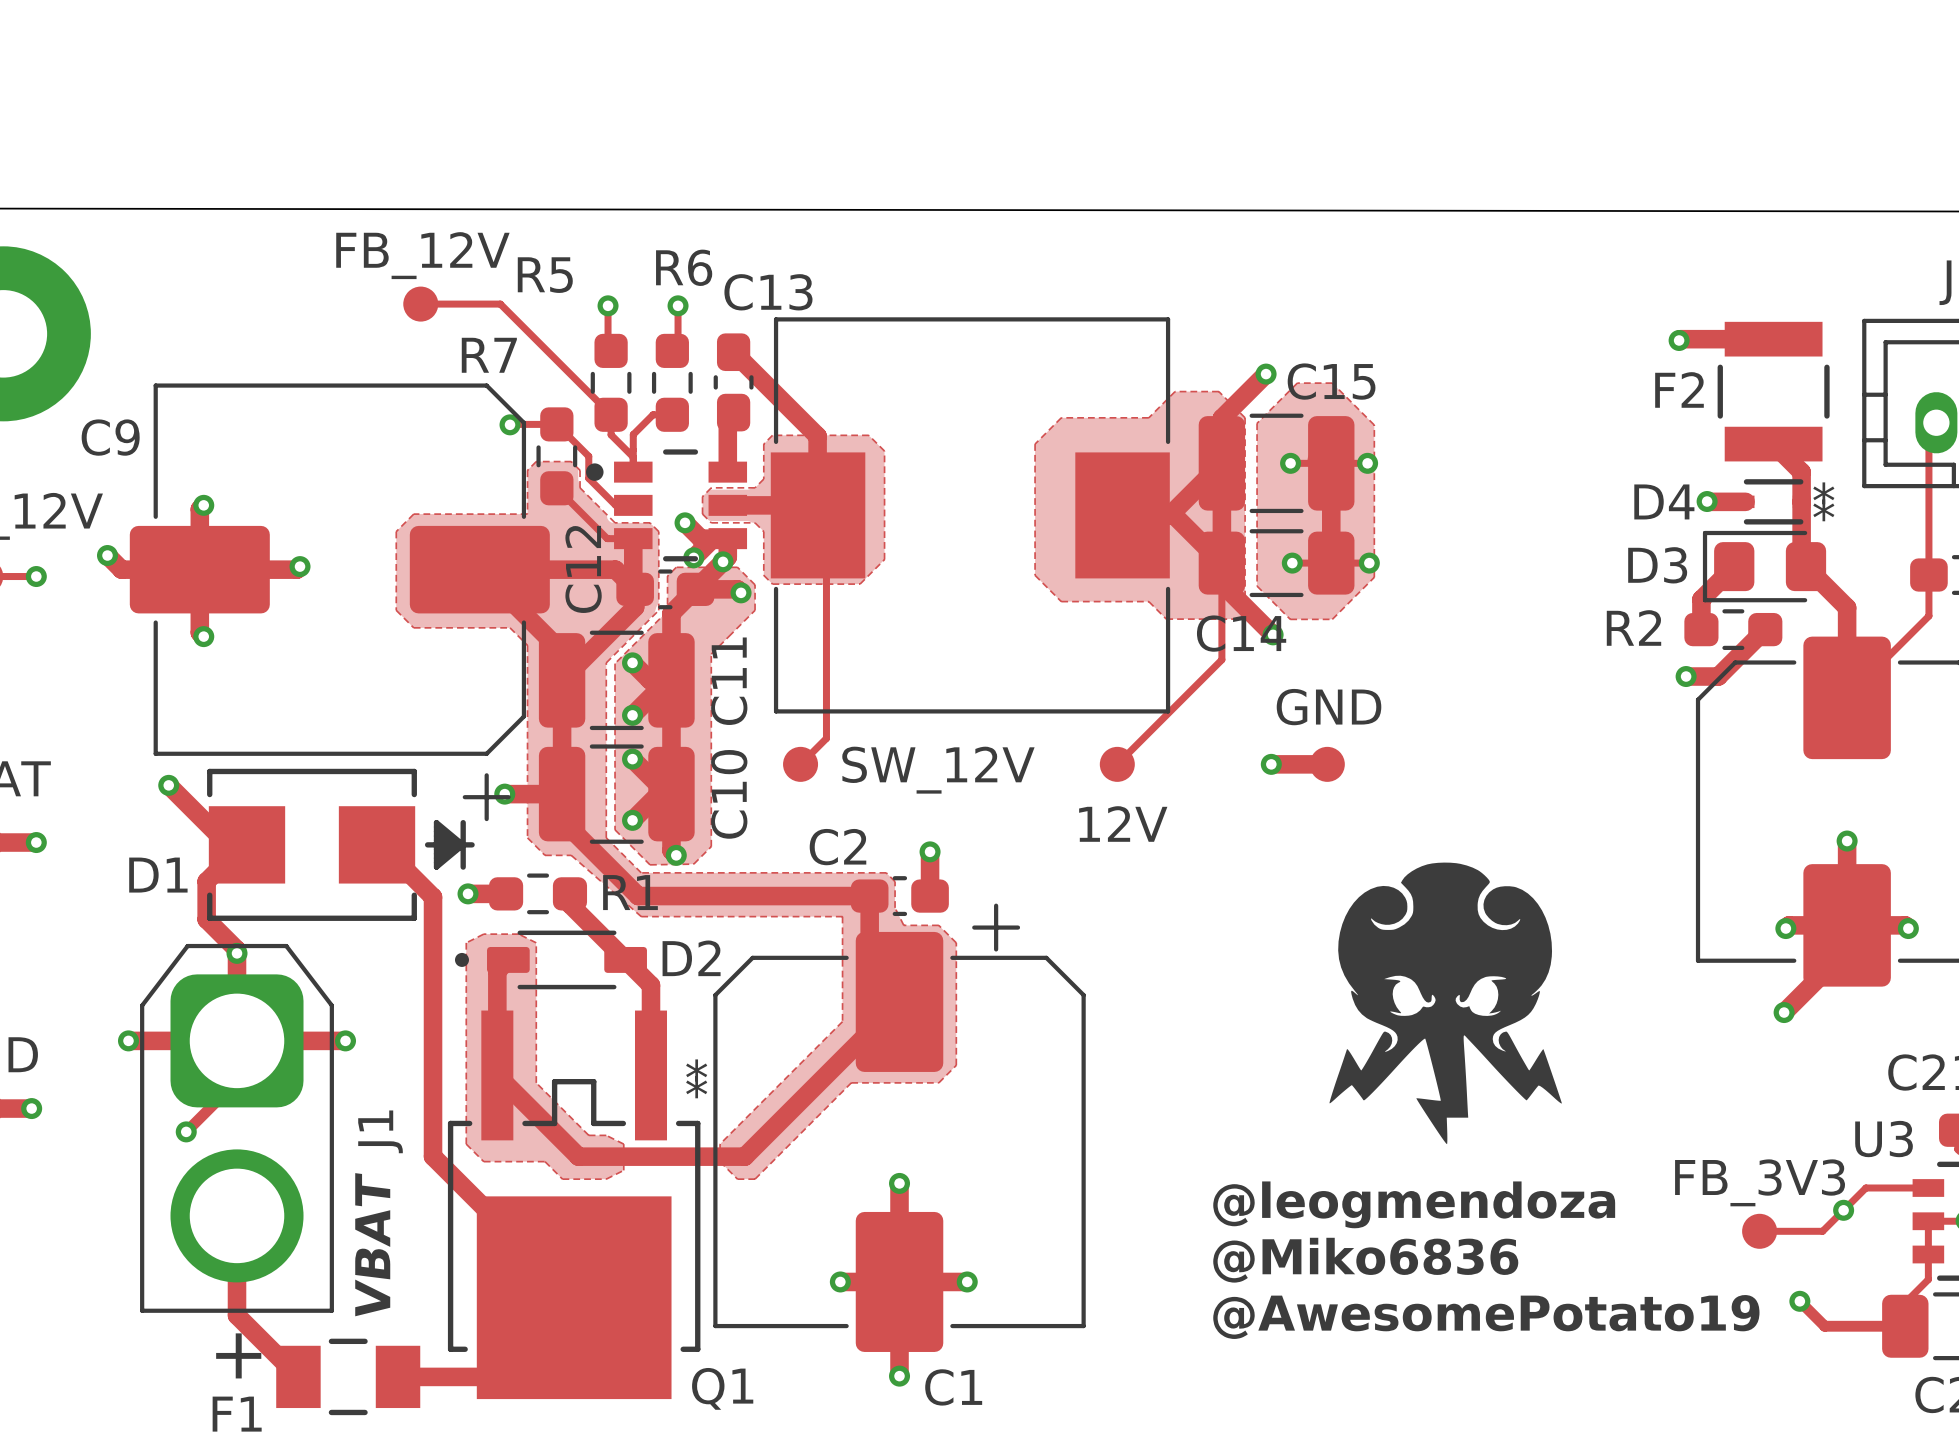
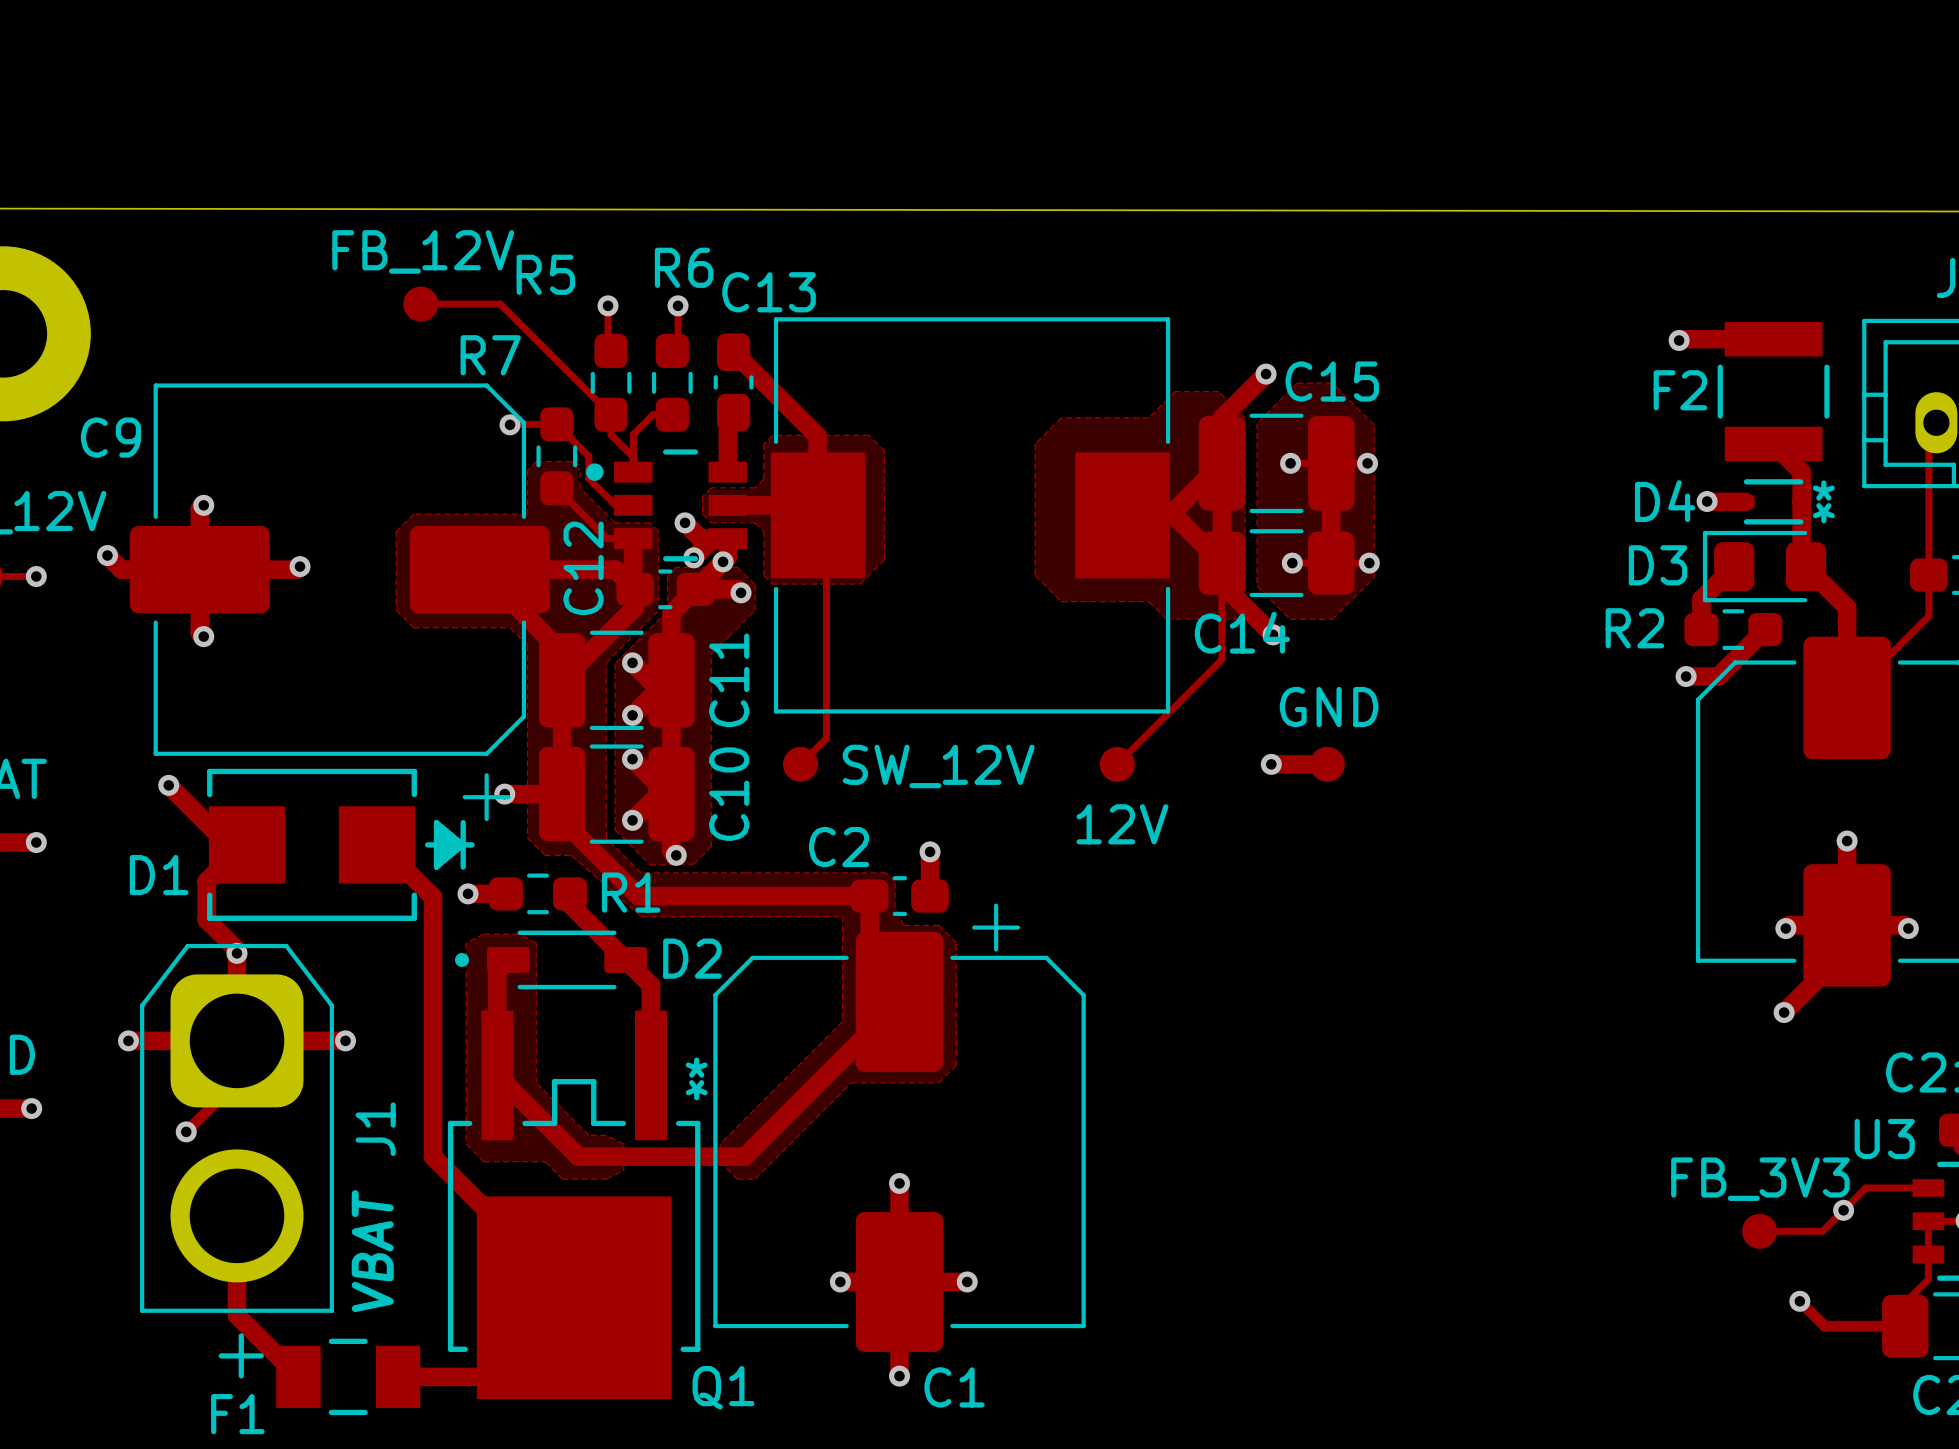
drawing: [1329, 862, 1562, 1145] -> none
text: @leogmendoza (1414, 1204) -> none
text: @Miko6836 (1365, 1260) -> none
text: @AwesomePotato19 (1486, 1317) -> none

